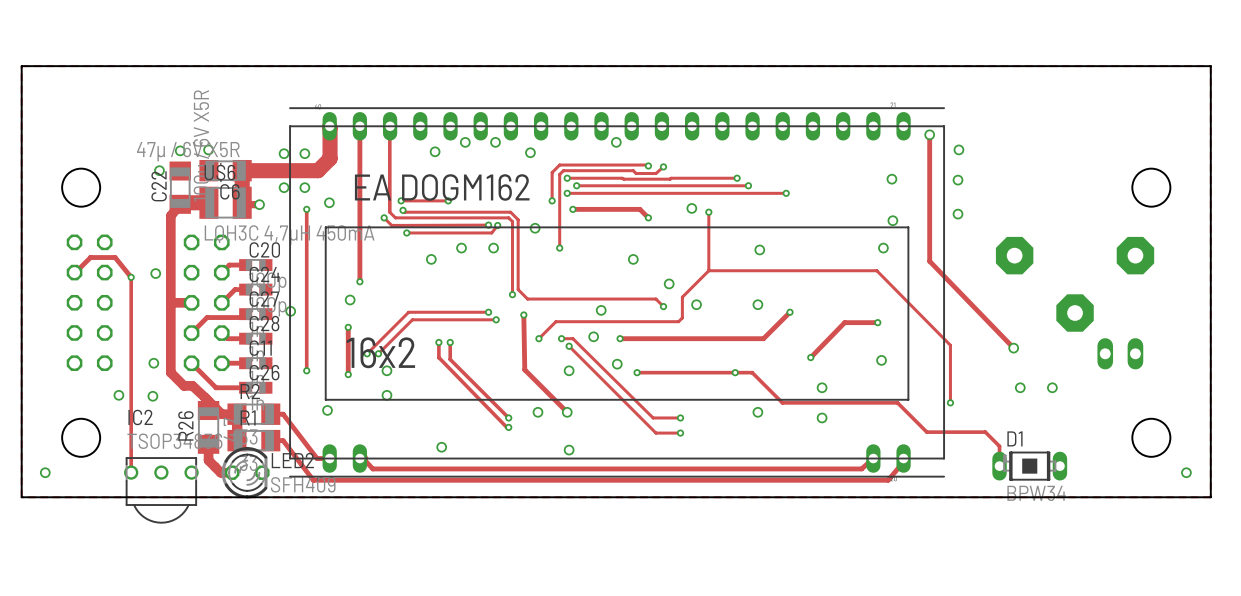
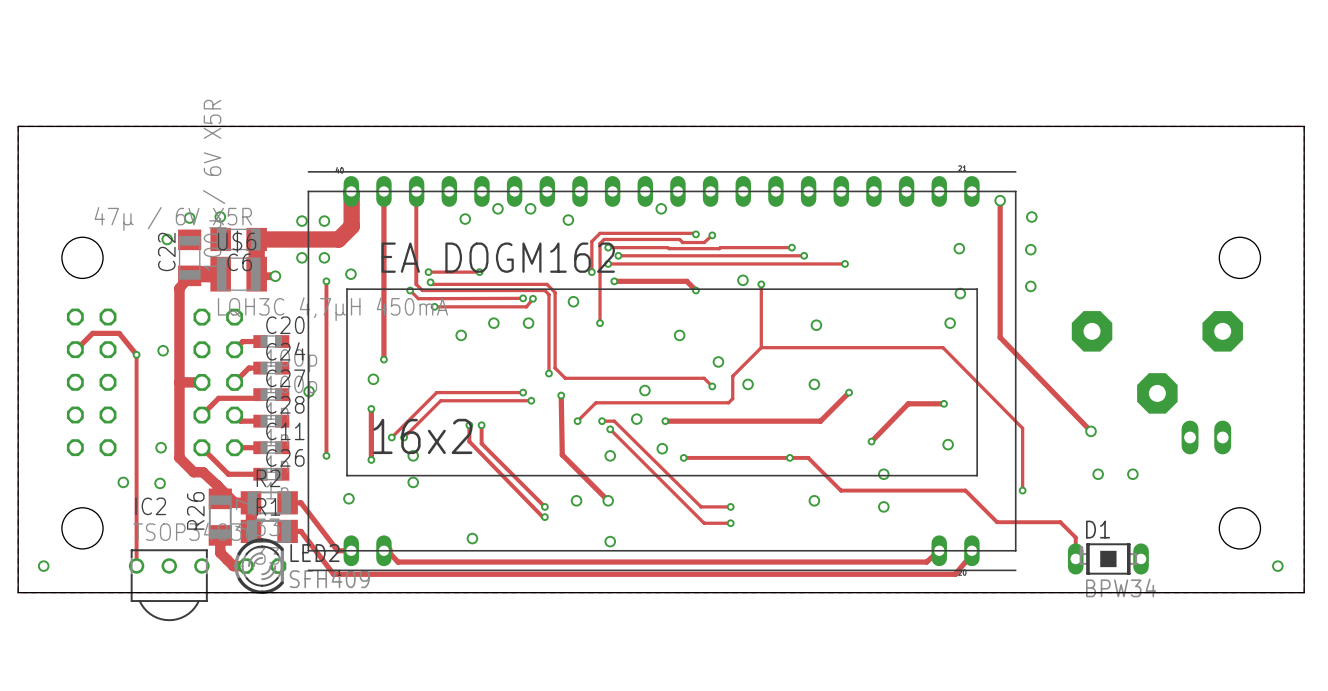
part footprint: [289, 107, 945, 478] -> [307, 171, 1017, 572]

